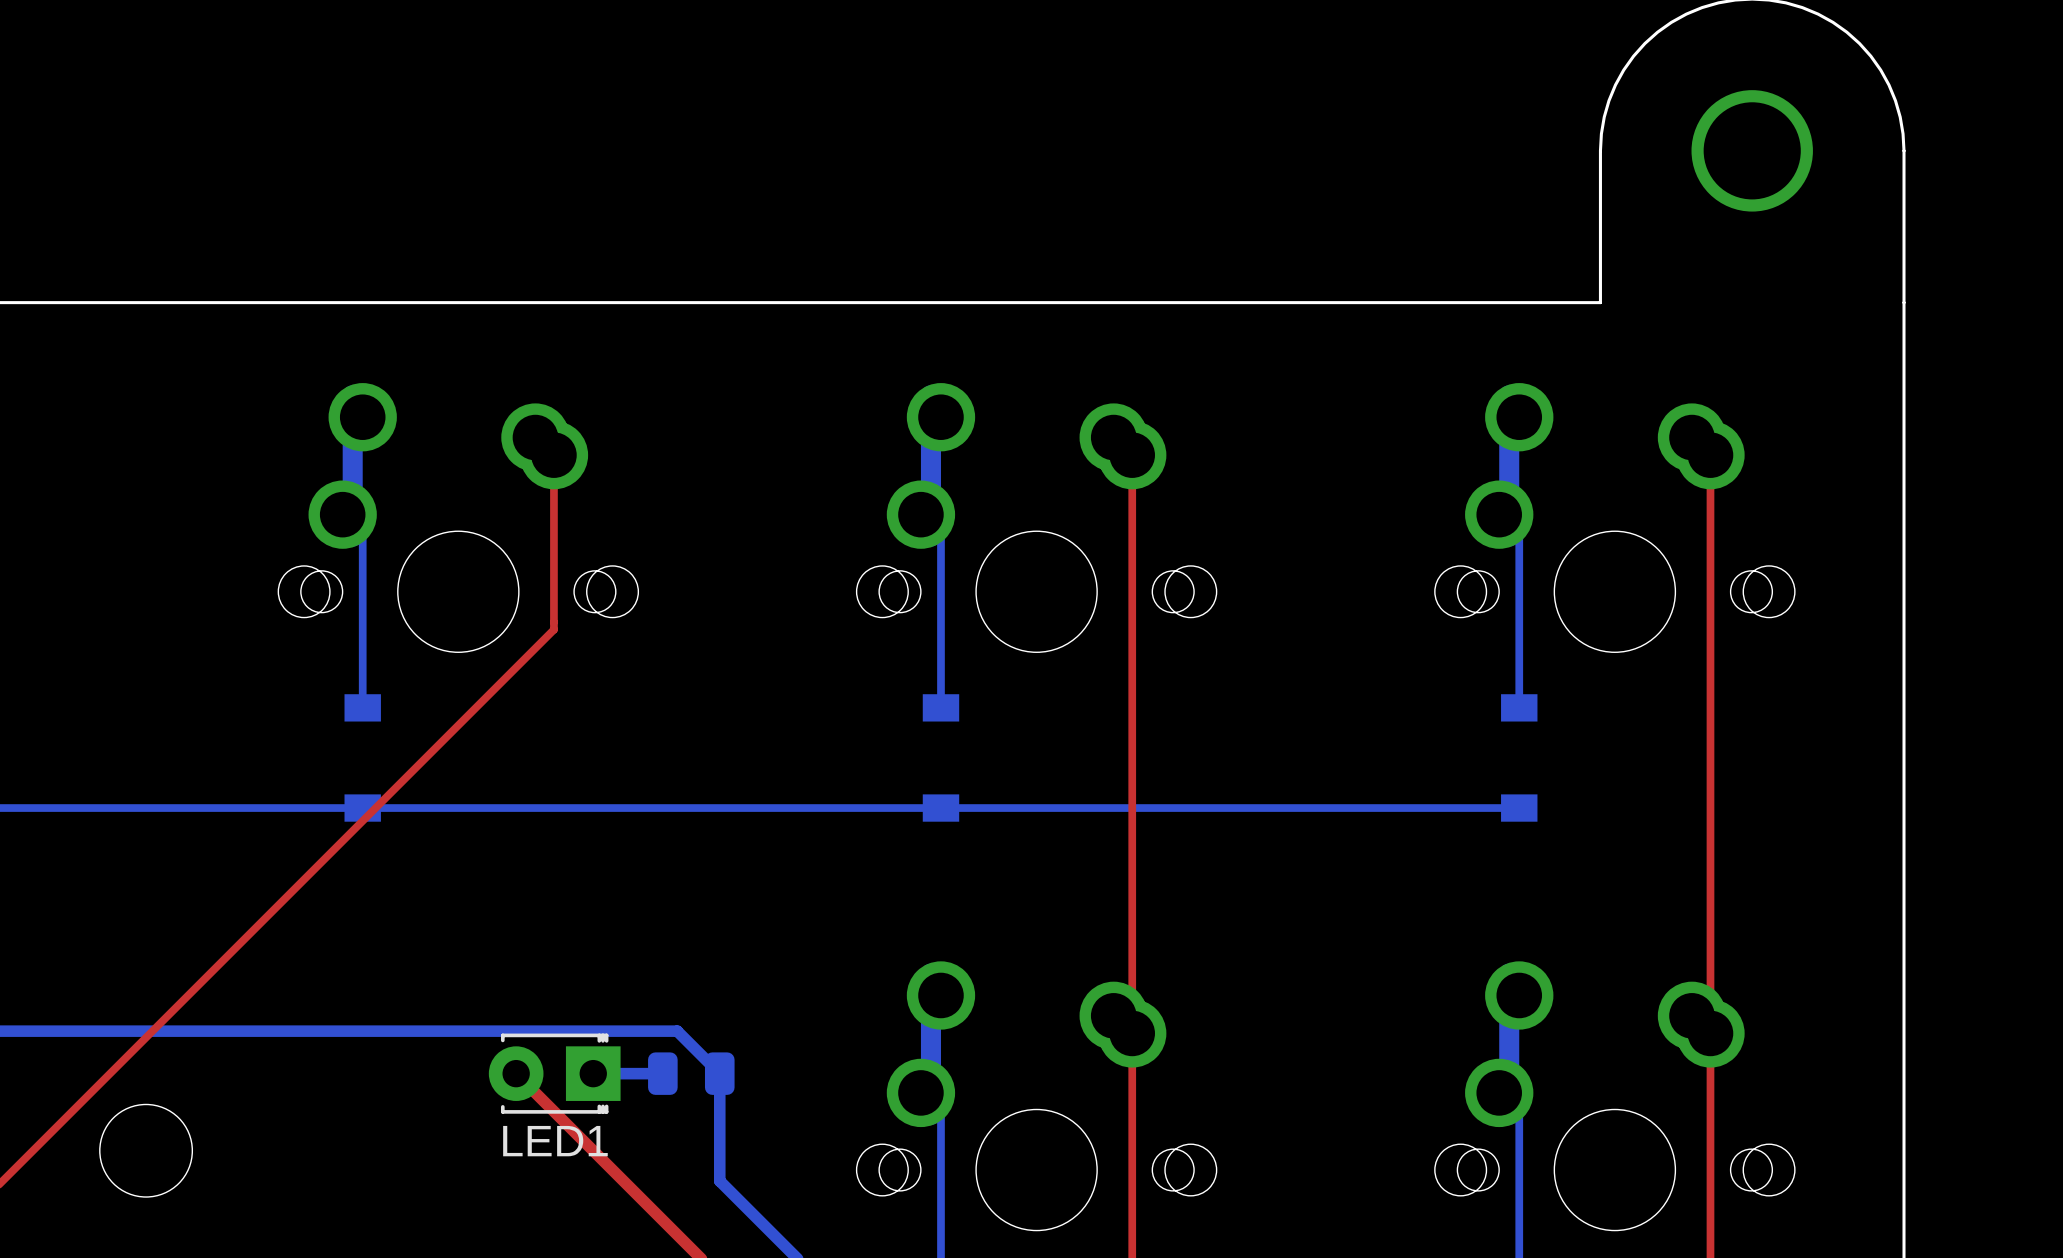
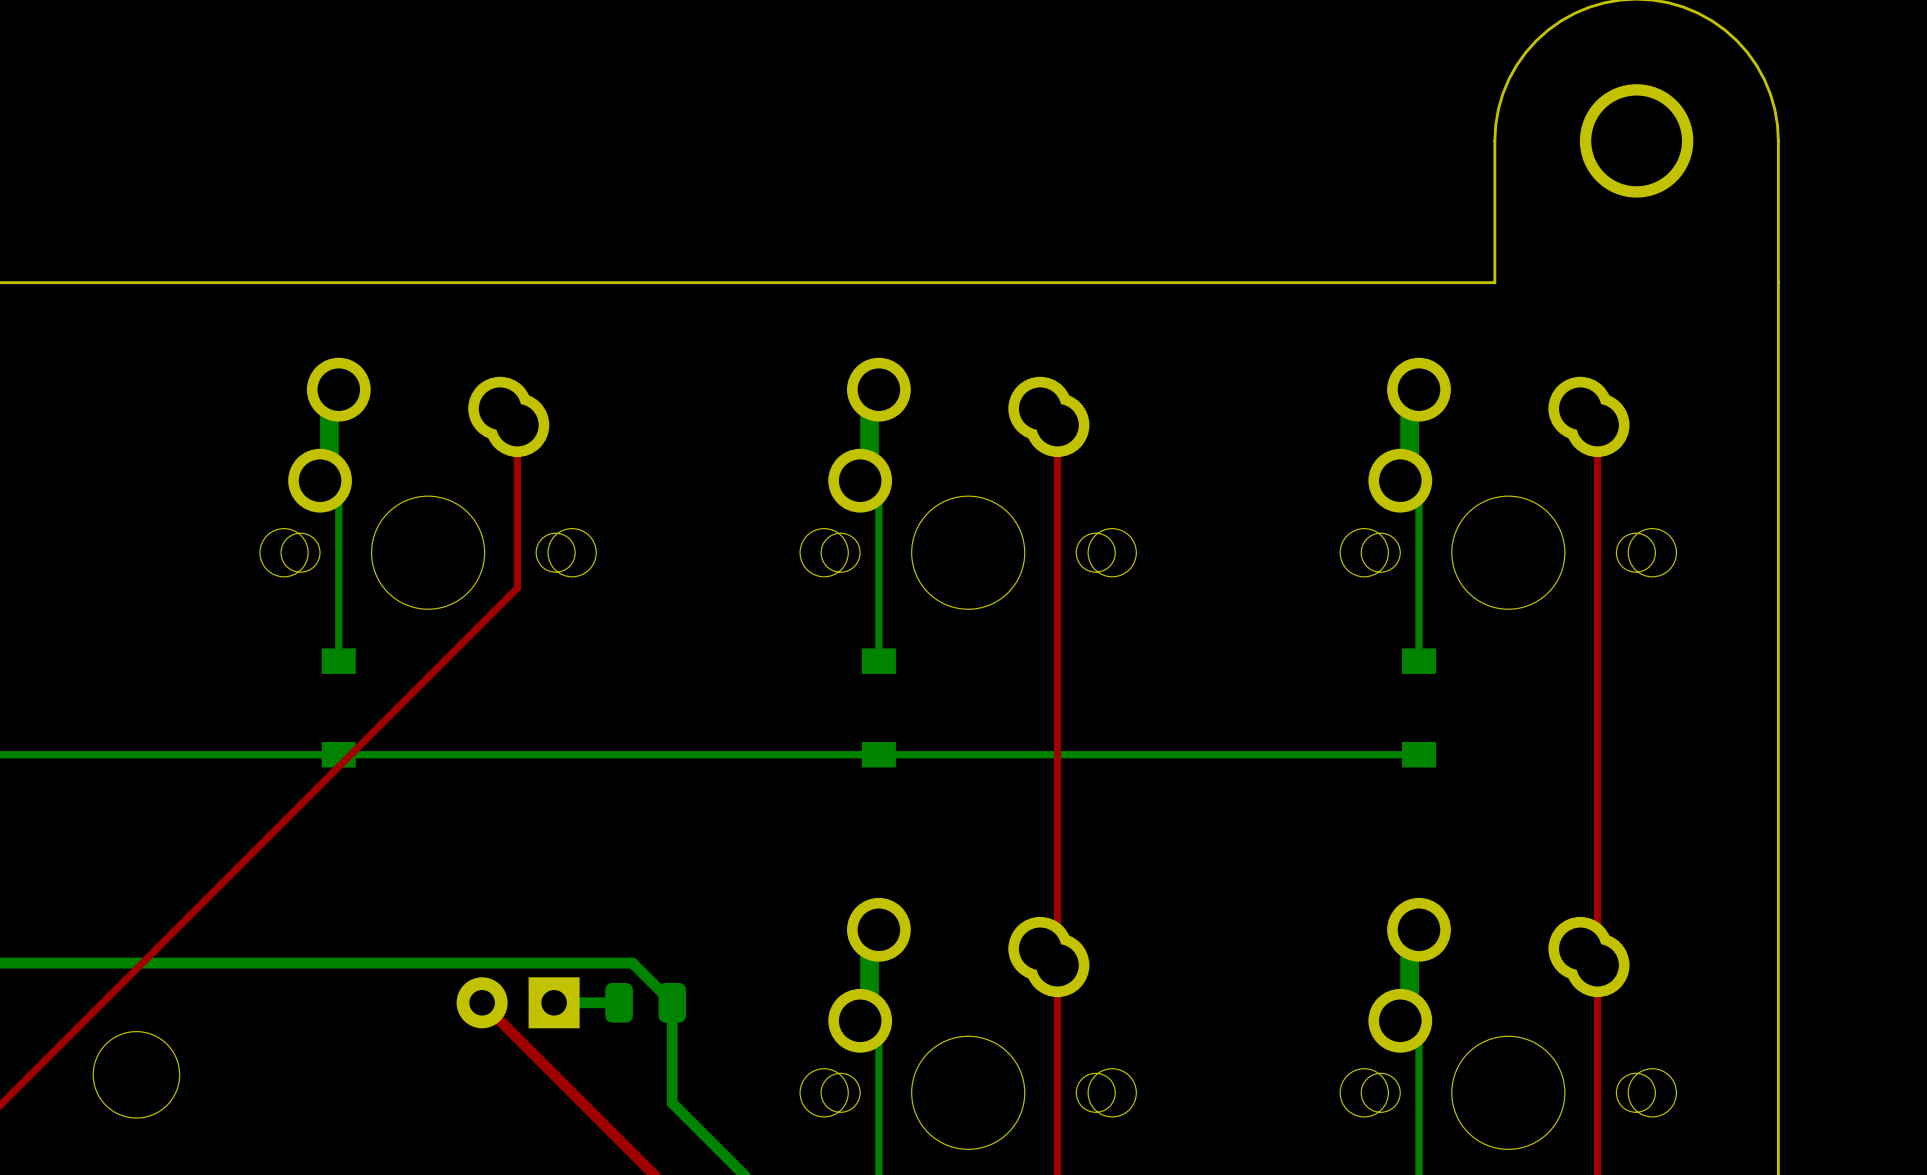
LED1: (554, 1073) -> none

